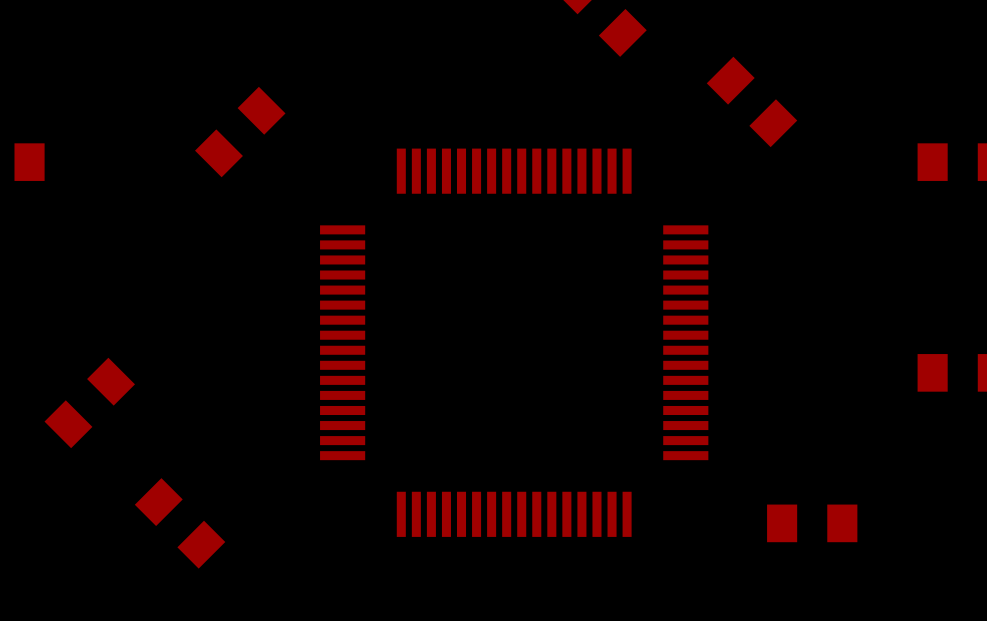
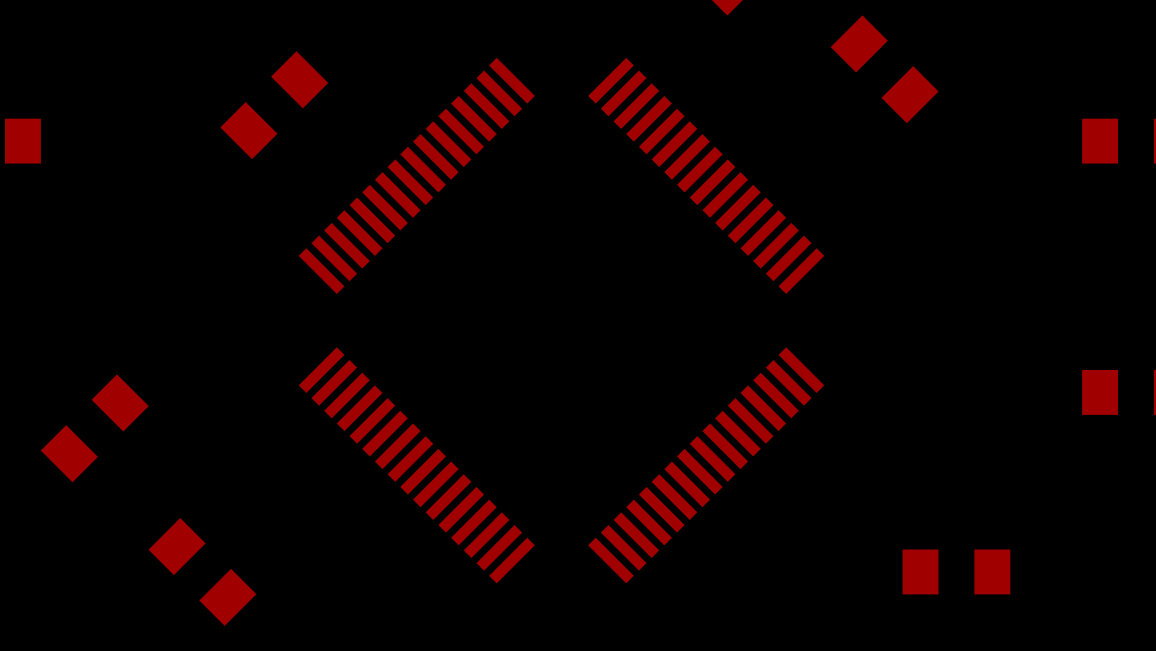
part: none -> (561, 320)
part: (514, 342) -> none

